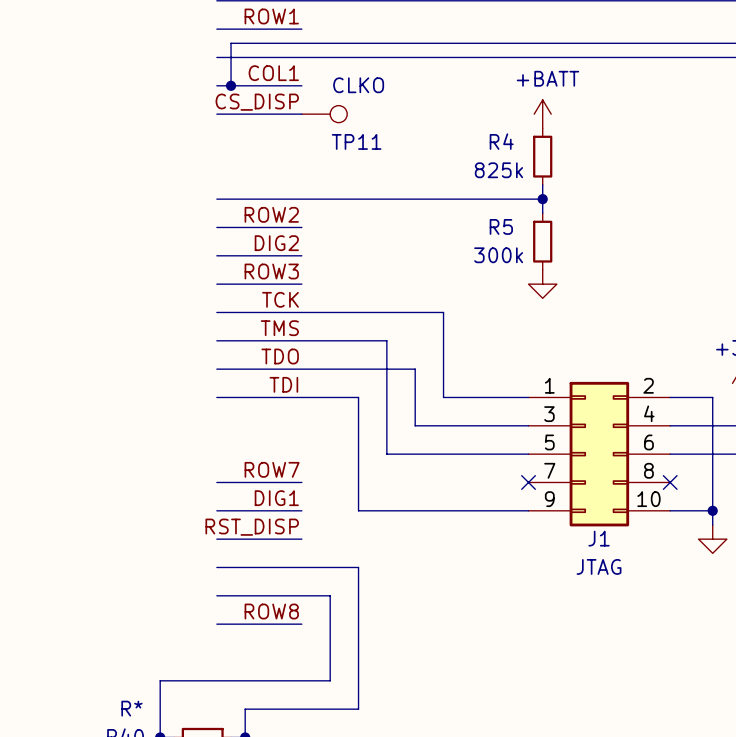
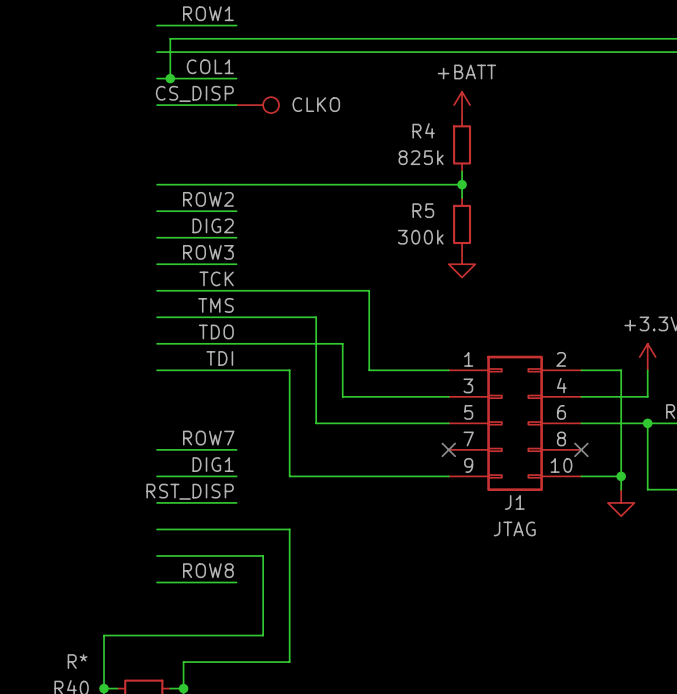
TP11 value position: CLKO (358, 85) -> CLKO (316, 104)
TP11 name: TP11 (356, 141) -> none

